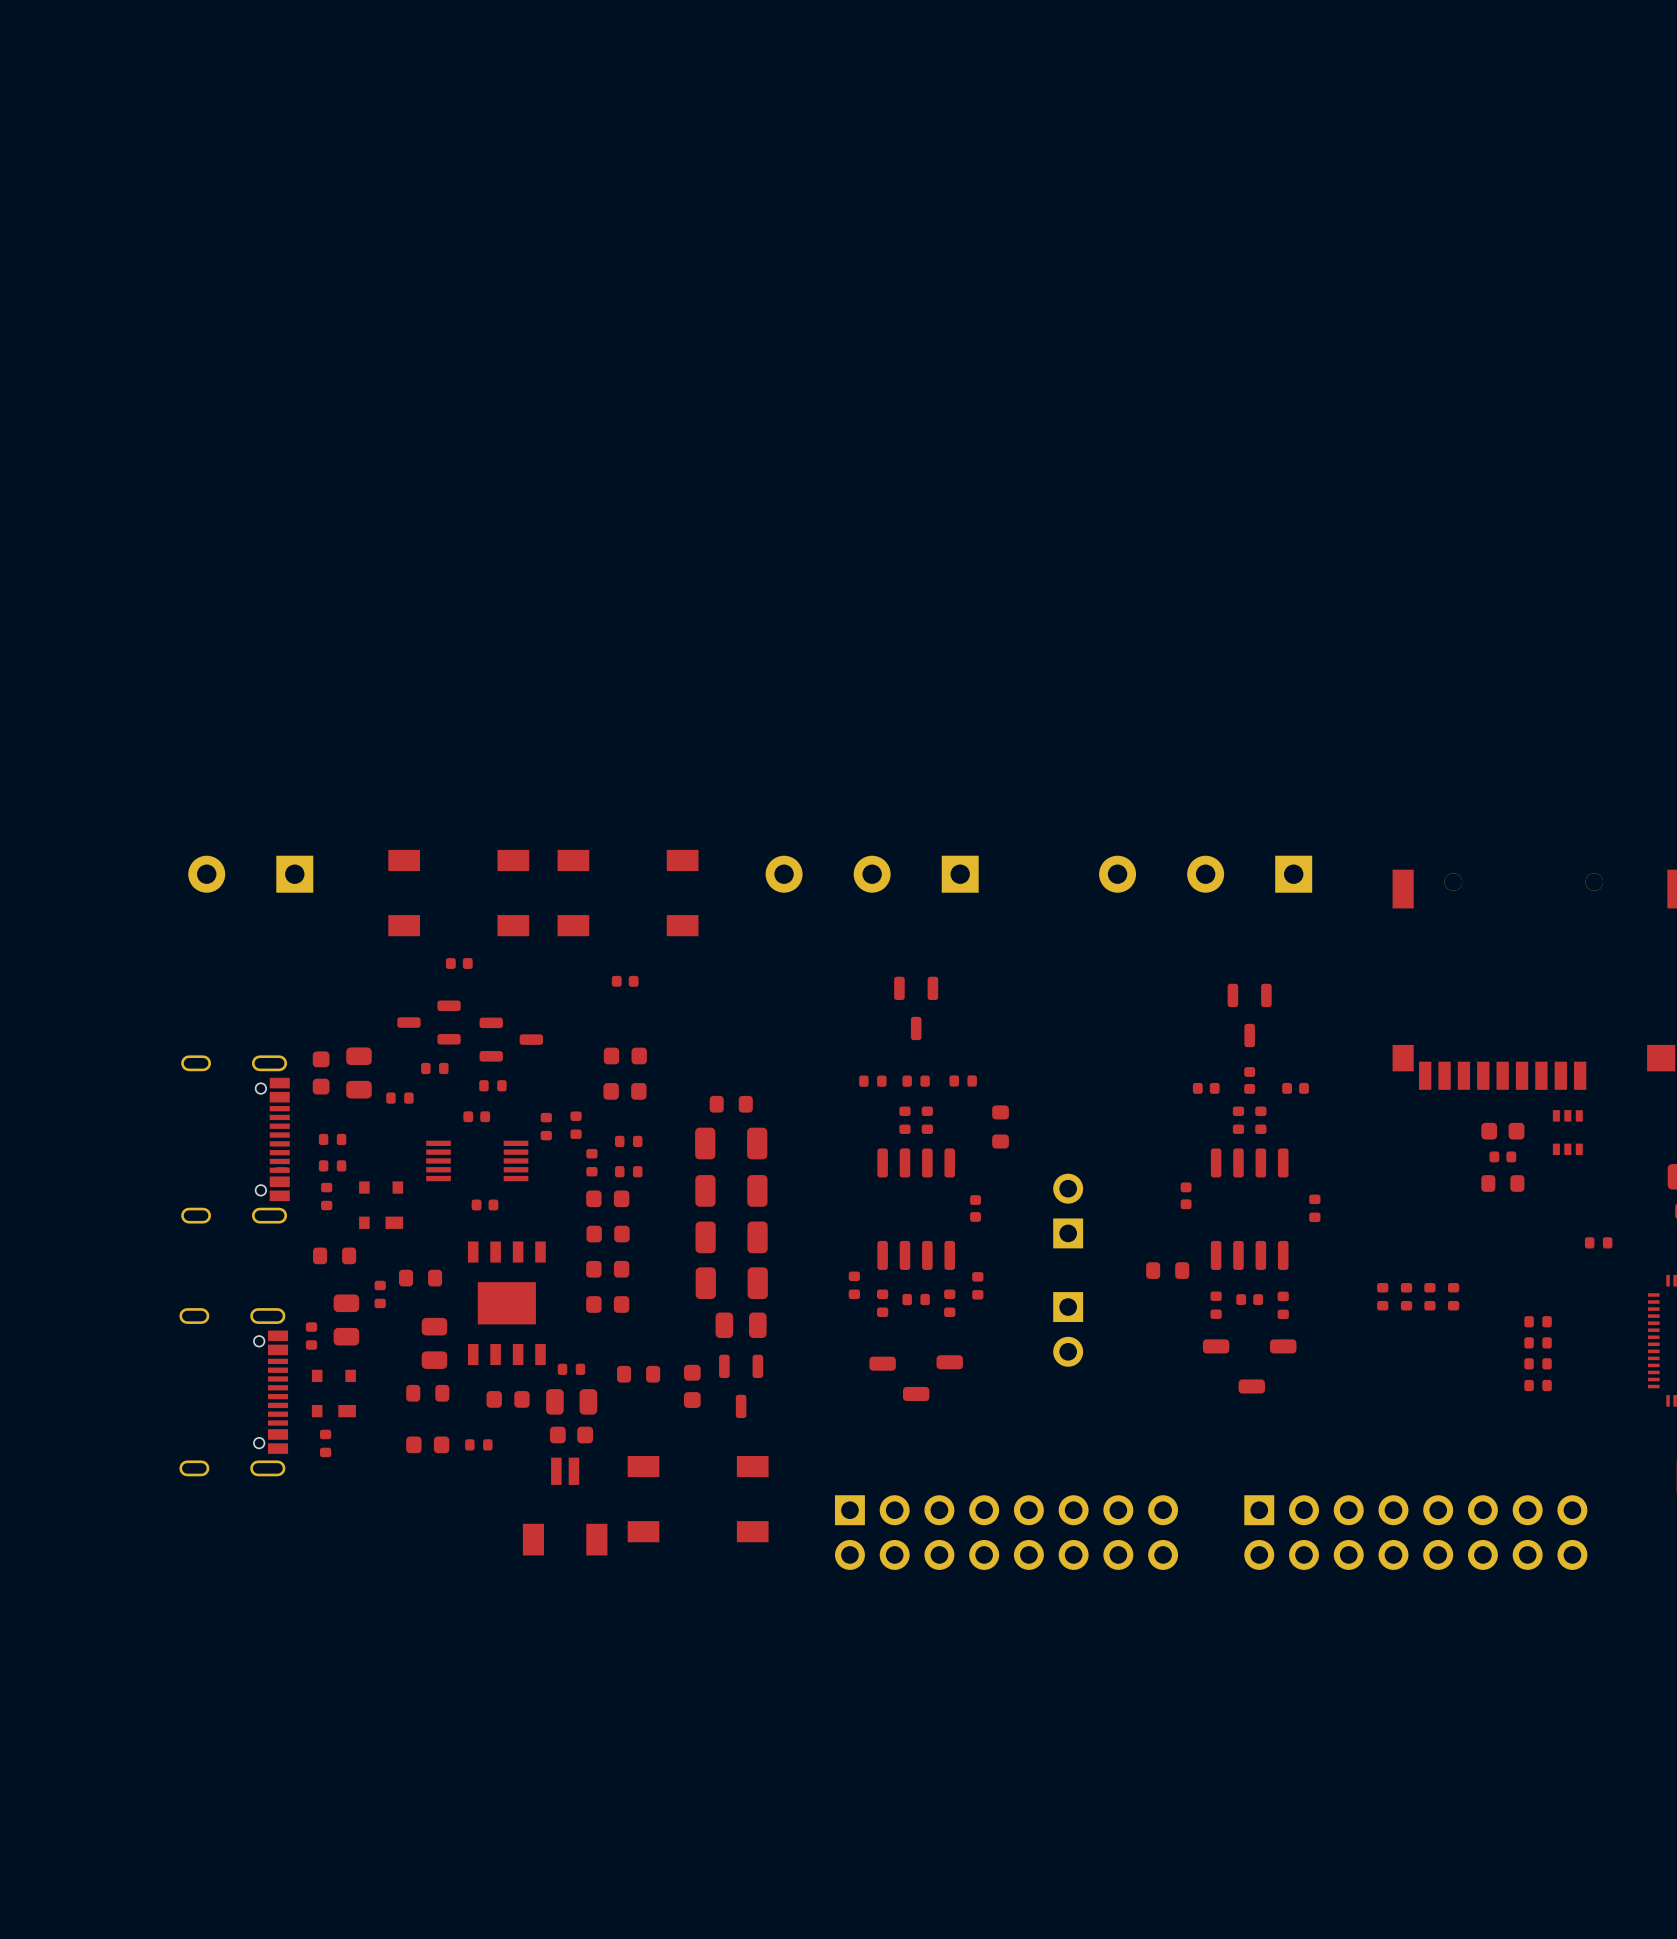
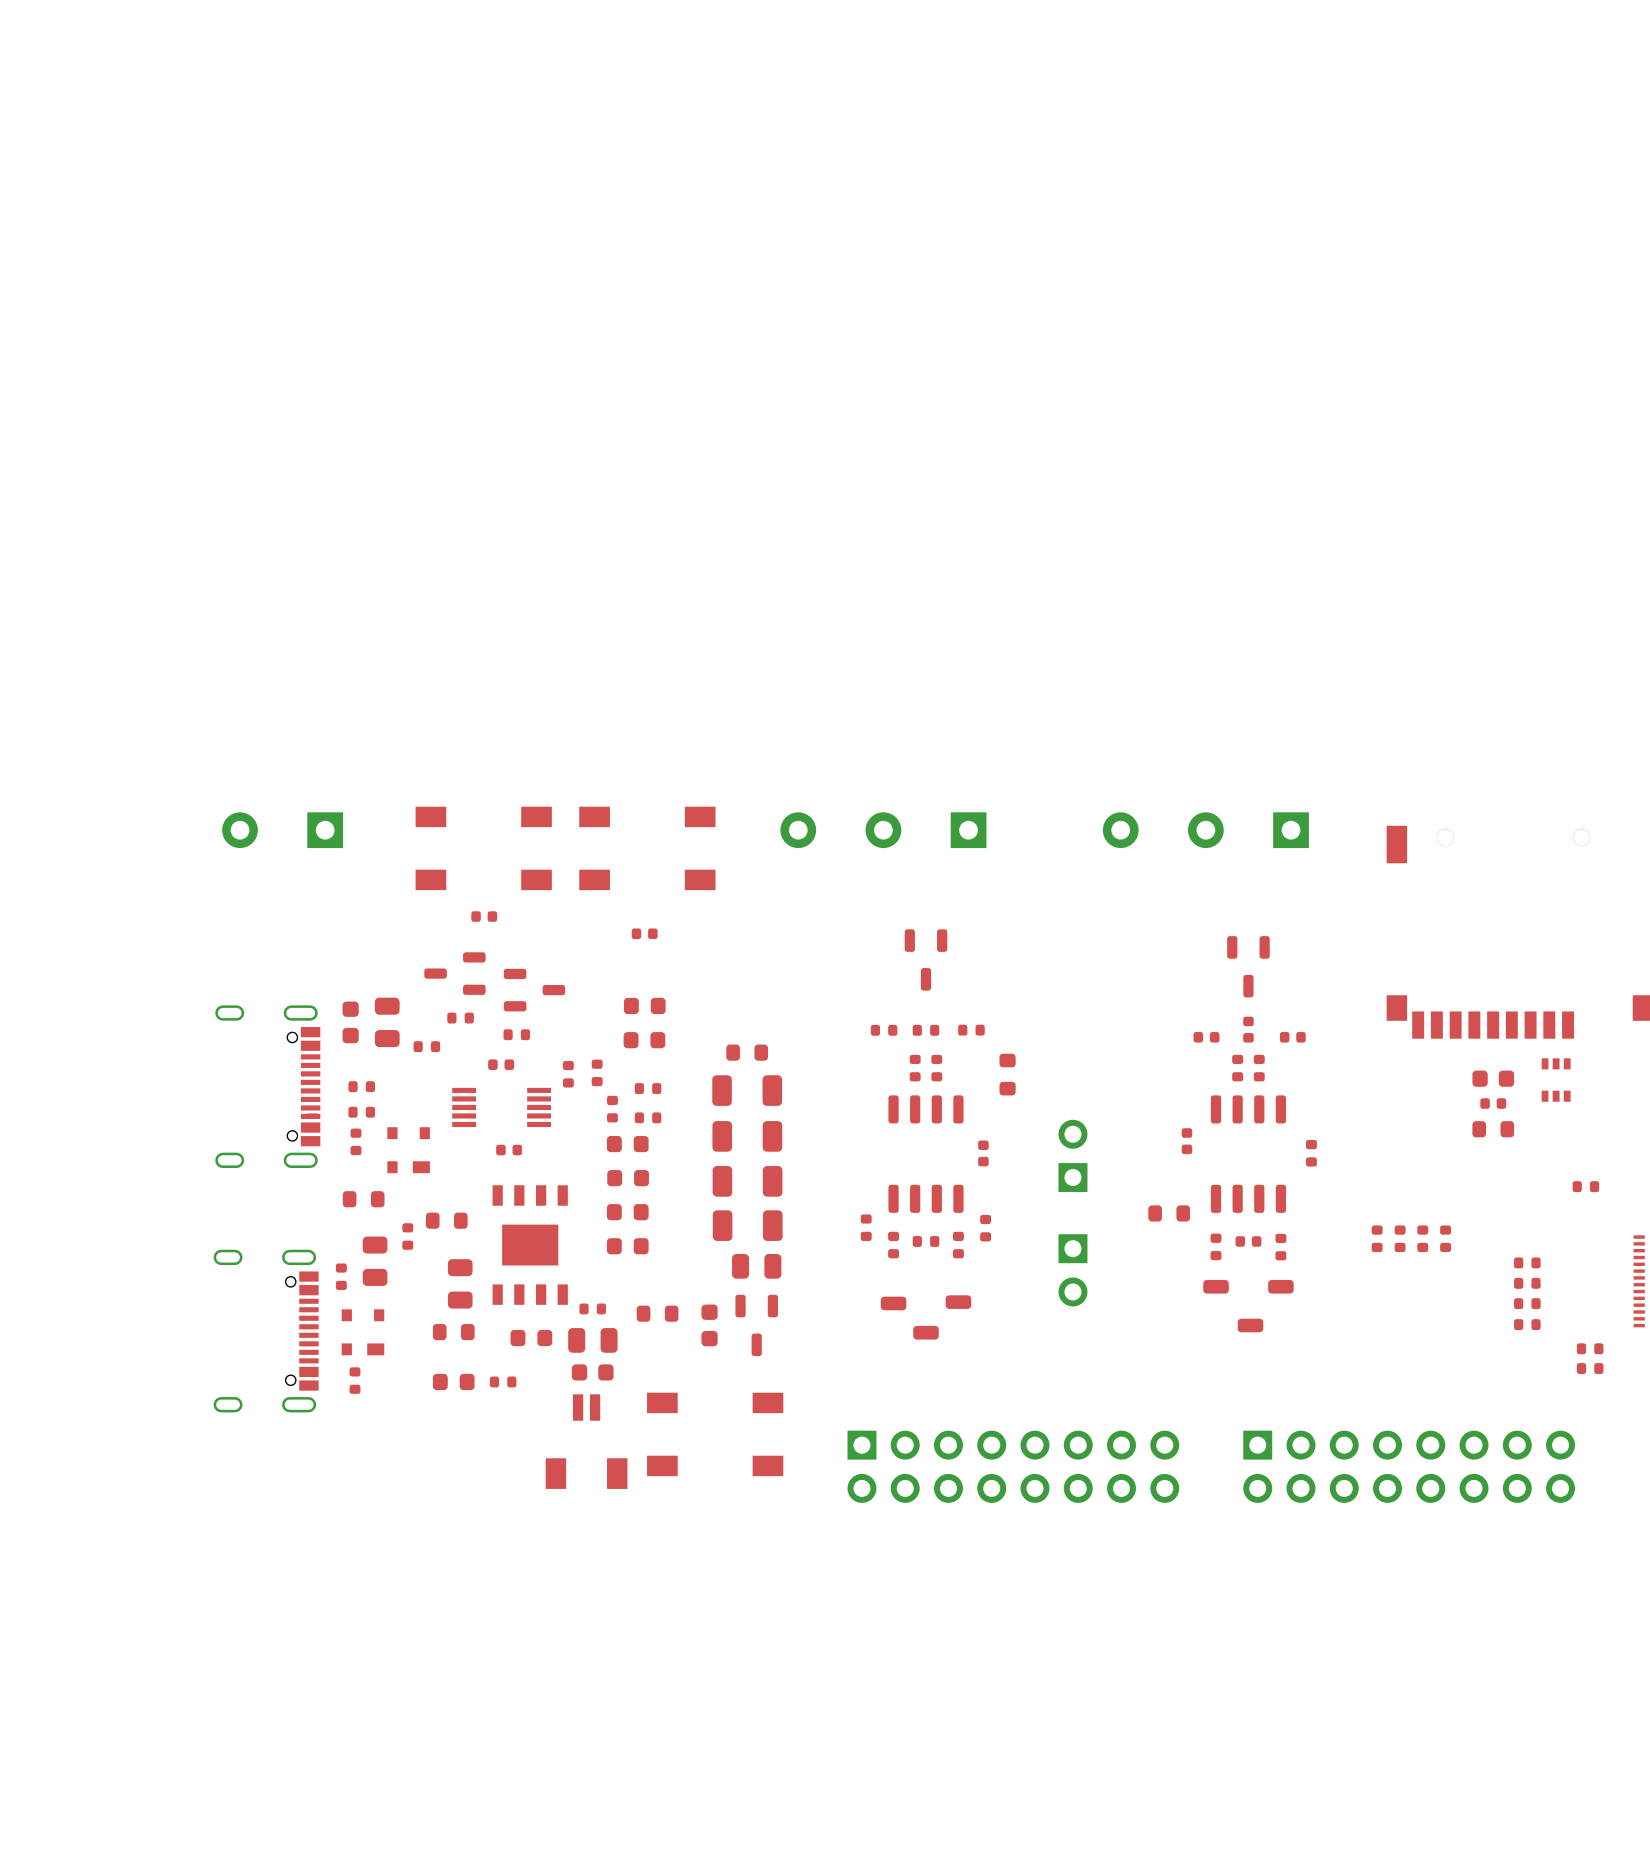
part: none -> (1590, 1348)
part: none -> (1590, 1368)

